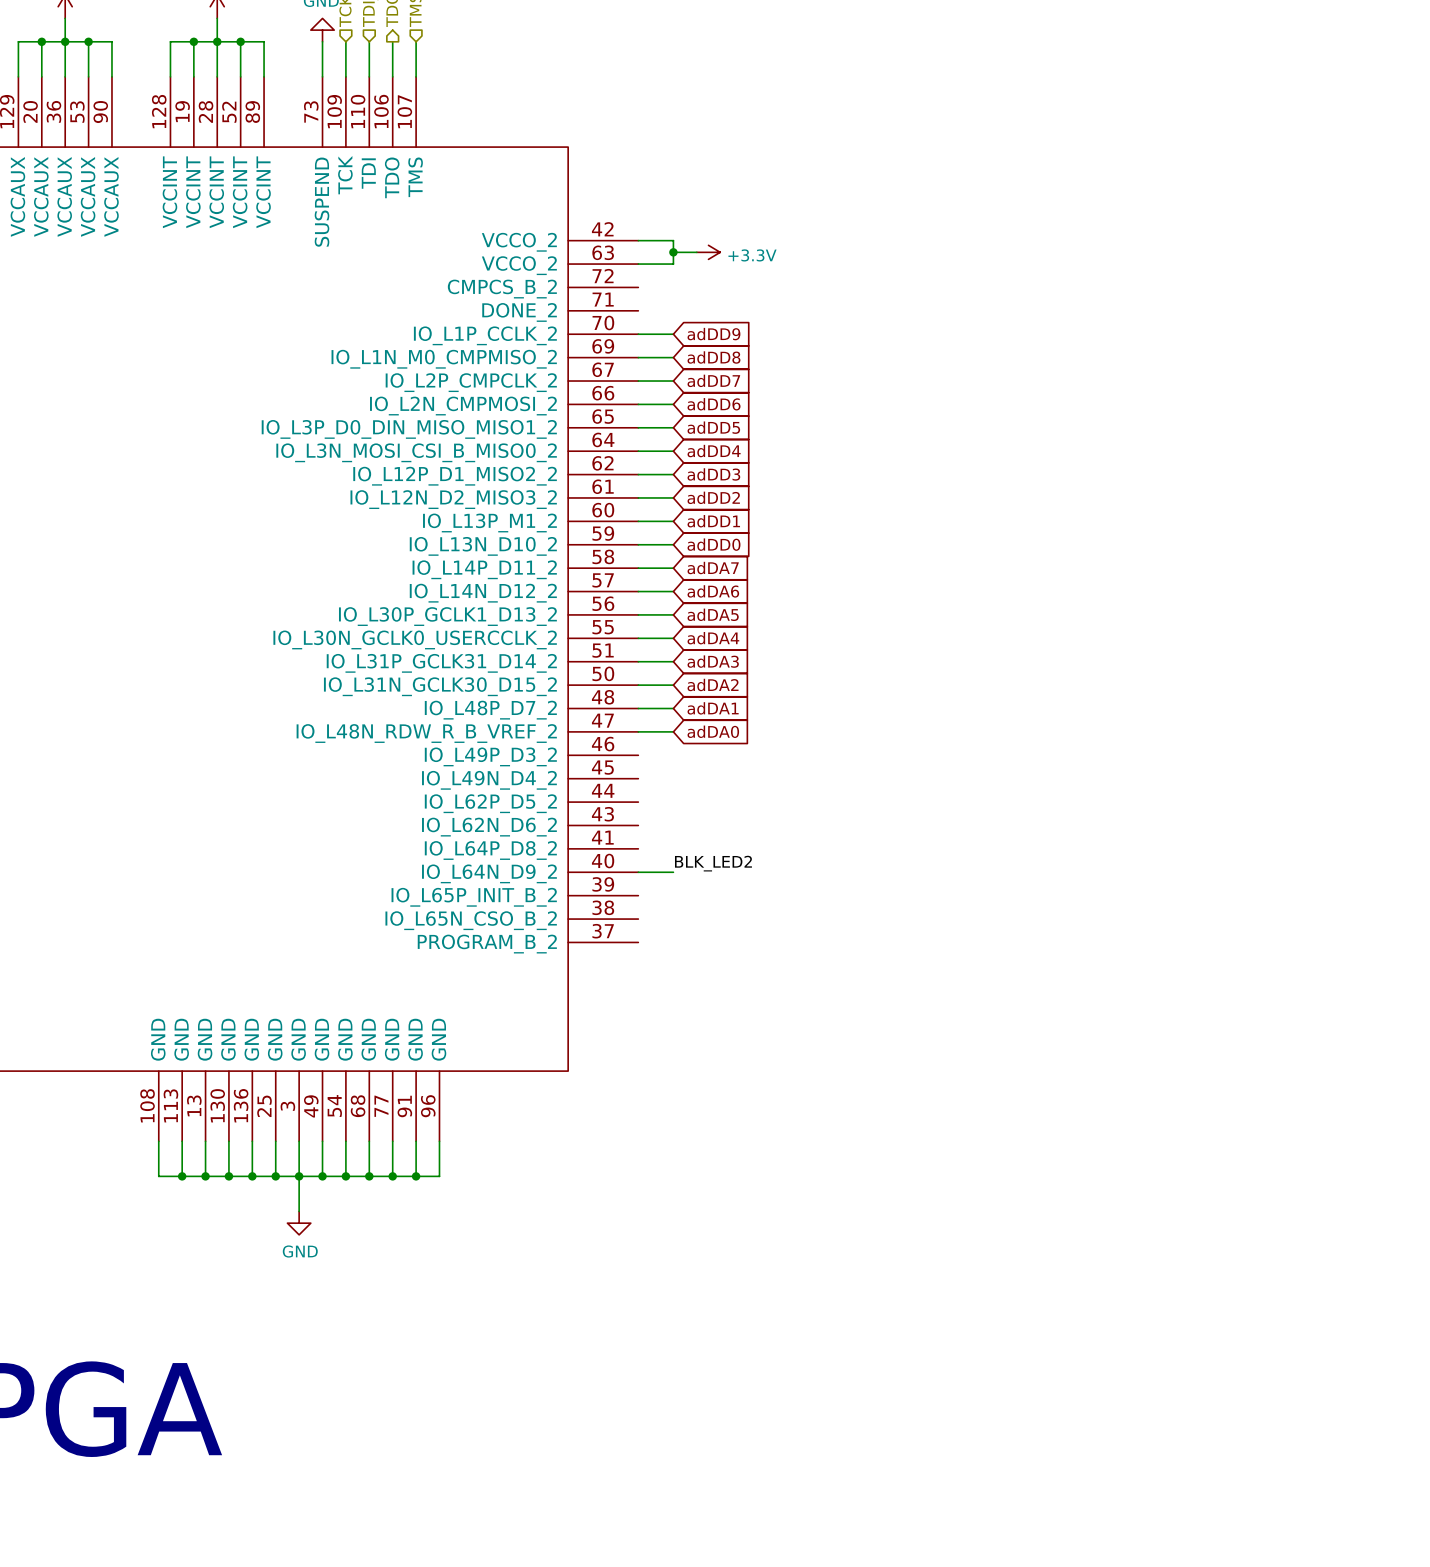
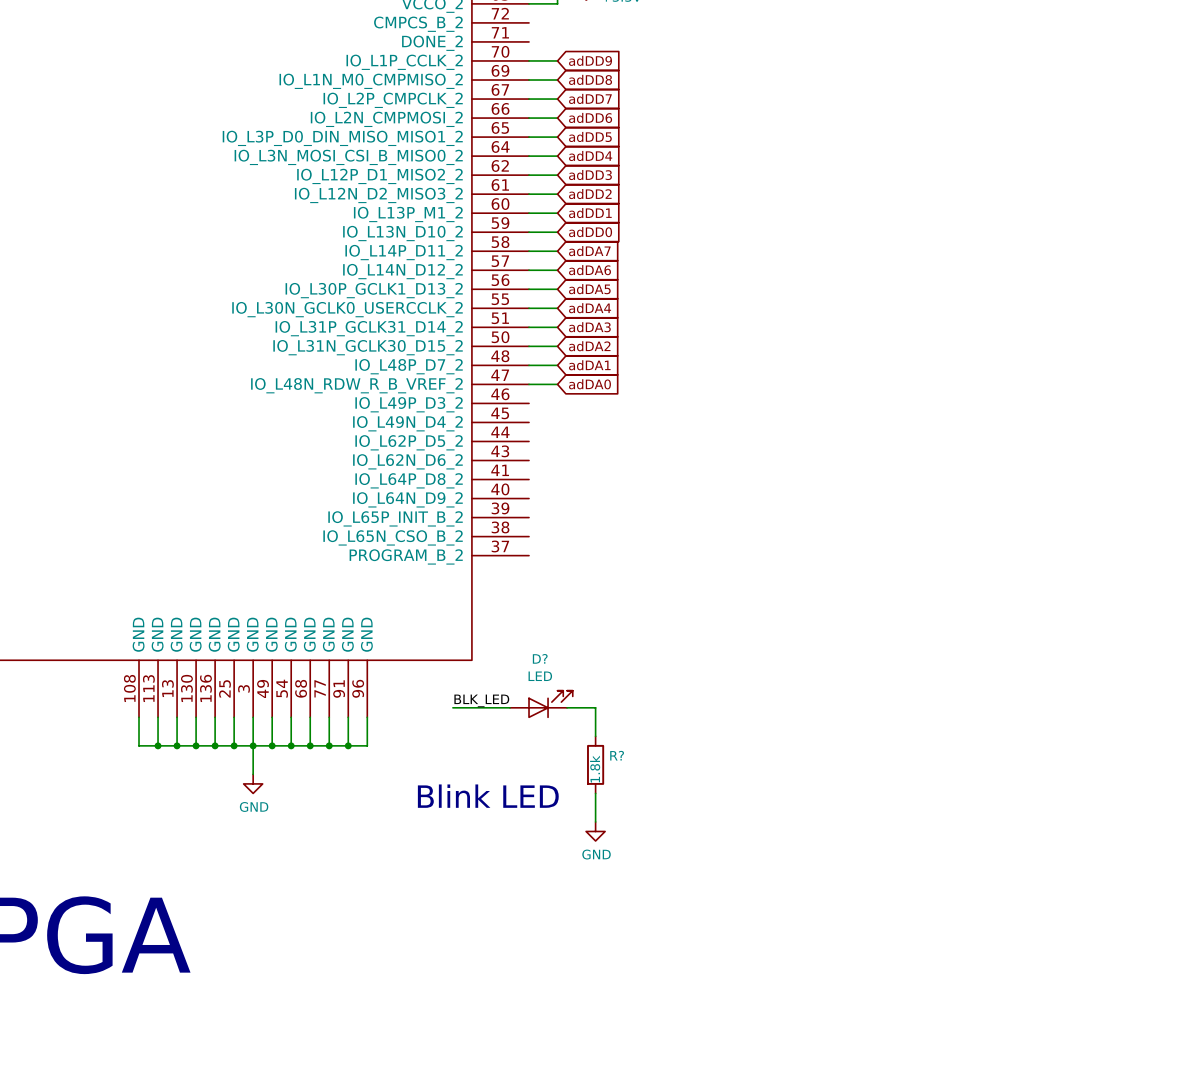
label: BLK_LED2 (713, 863) -> none
wire: (638, 872) (673, 872) -> none
label: none -> BLK_LED (481, 700)
D?: none -> LED (541, 704)
wire: none -> (452, 707) (509, 707)
wire: none -> (567, 707) (595, 707) (595, 736)
R?: none -> 1.8k (595, 764)
wire: none -> (595, 793) (595, 821)
text: none -> Blink LED (488, 796)
power symbol: none -> GND (595, 831)

